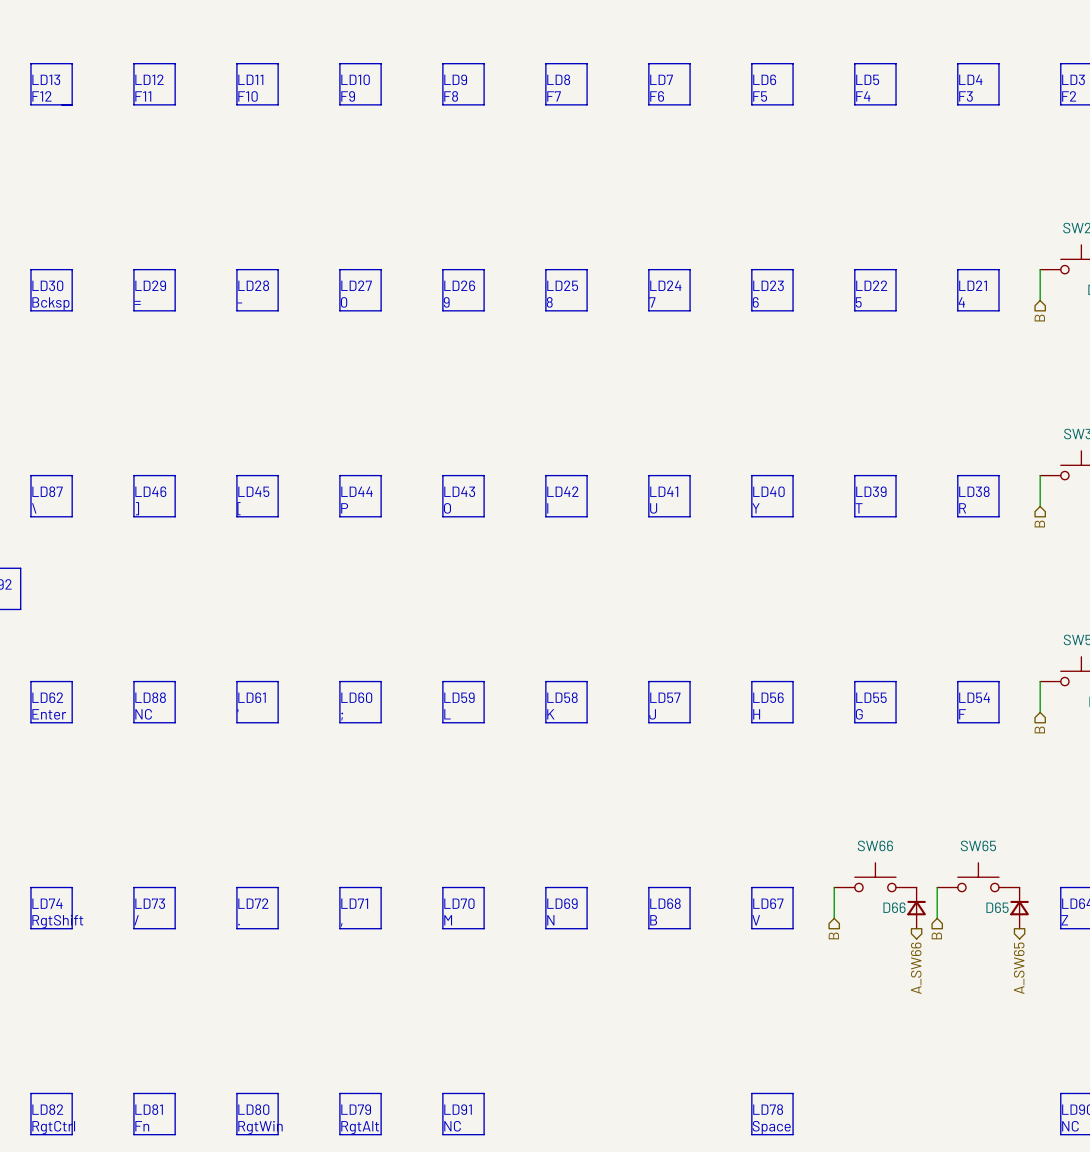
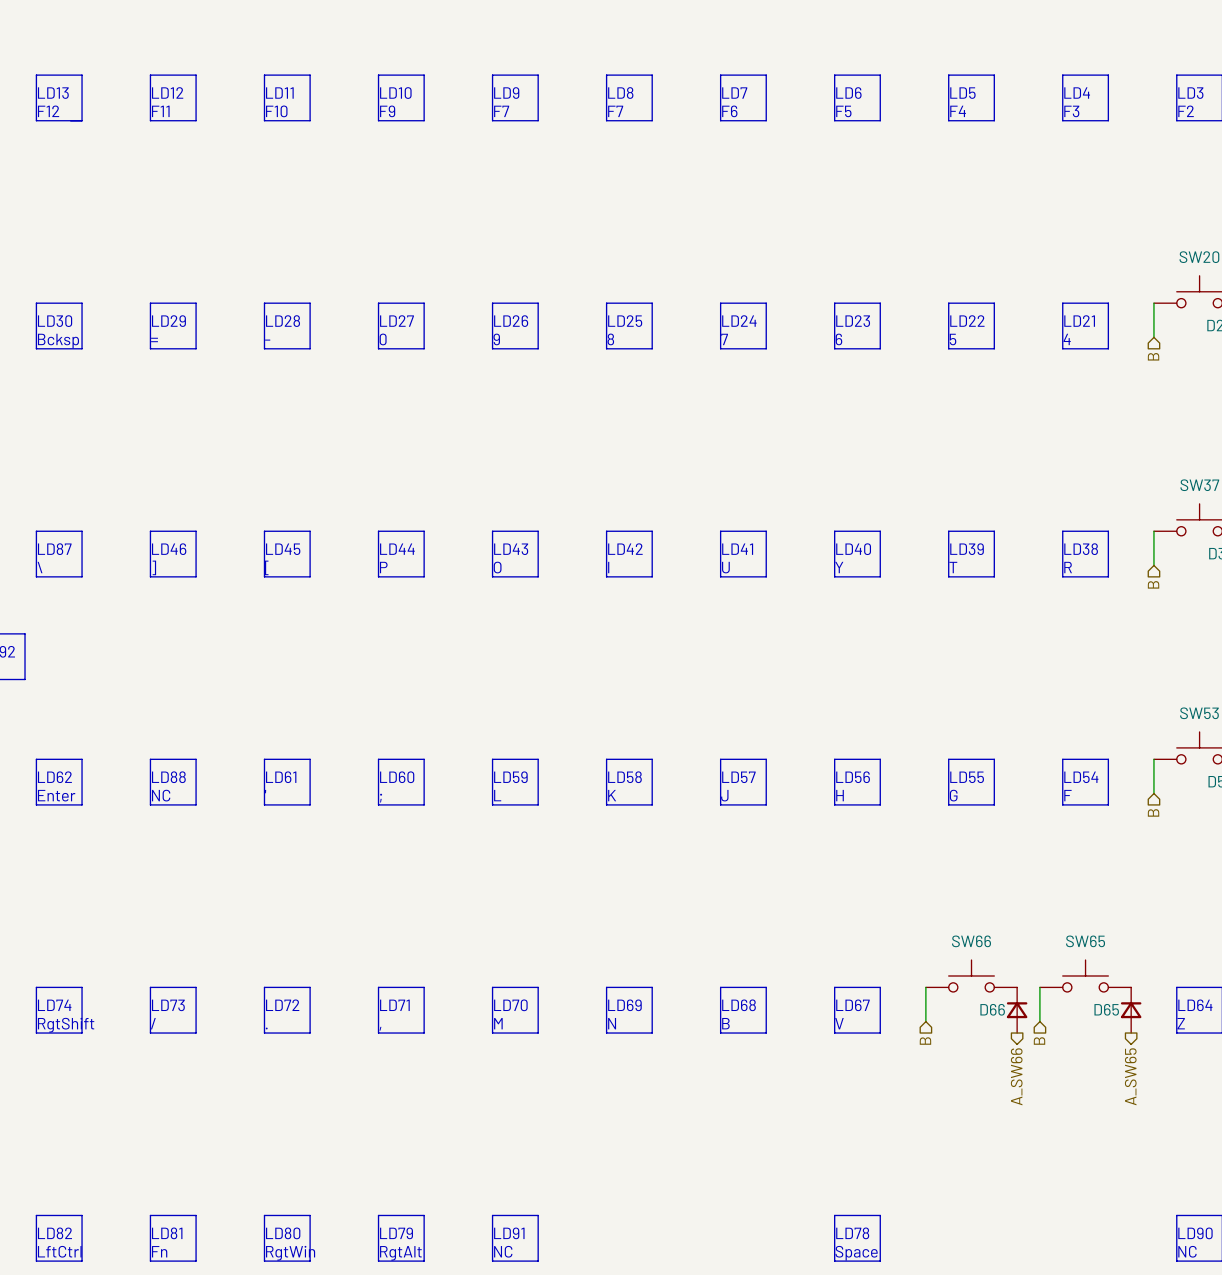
text: F8 (451, 96) -> F7 (501, 111)
text: RgtCtrl (53, 1127) -> LftCtrl (59, 1251)

